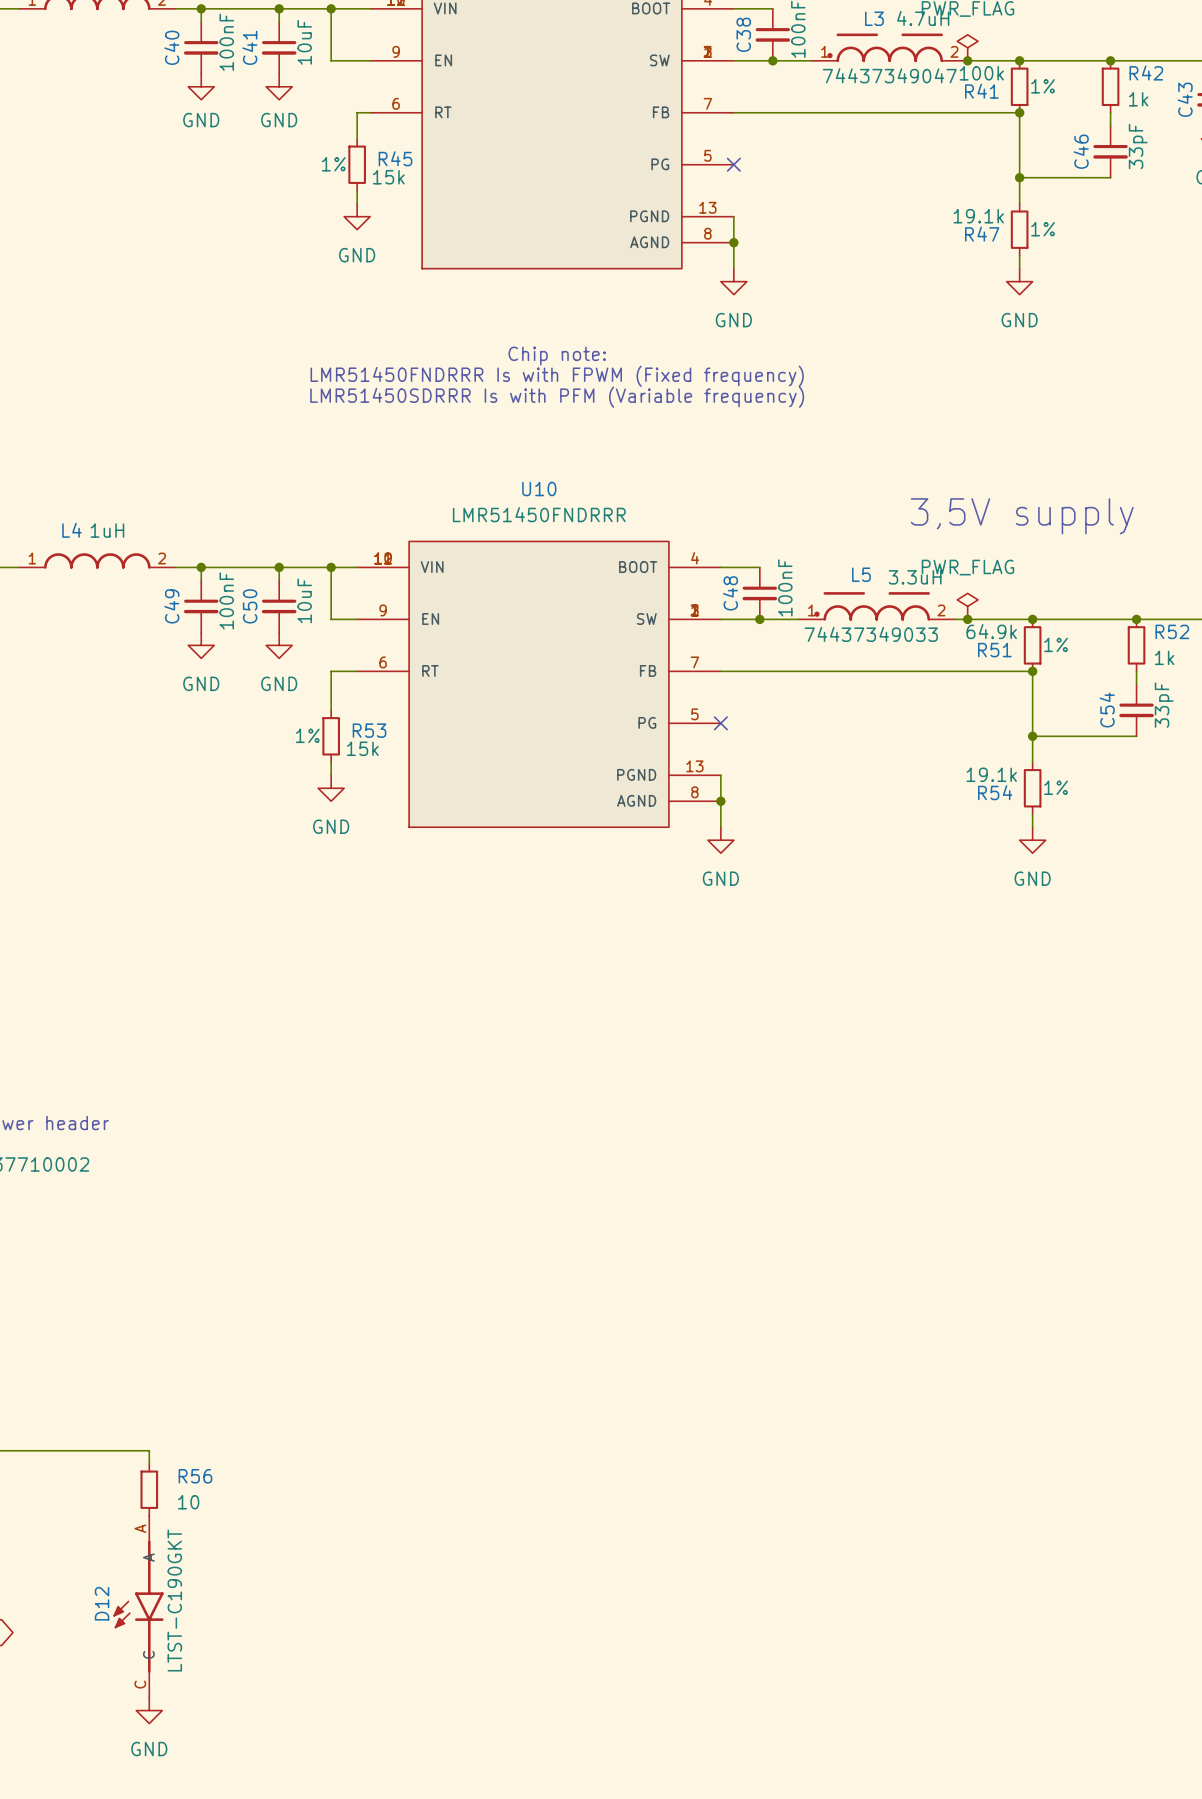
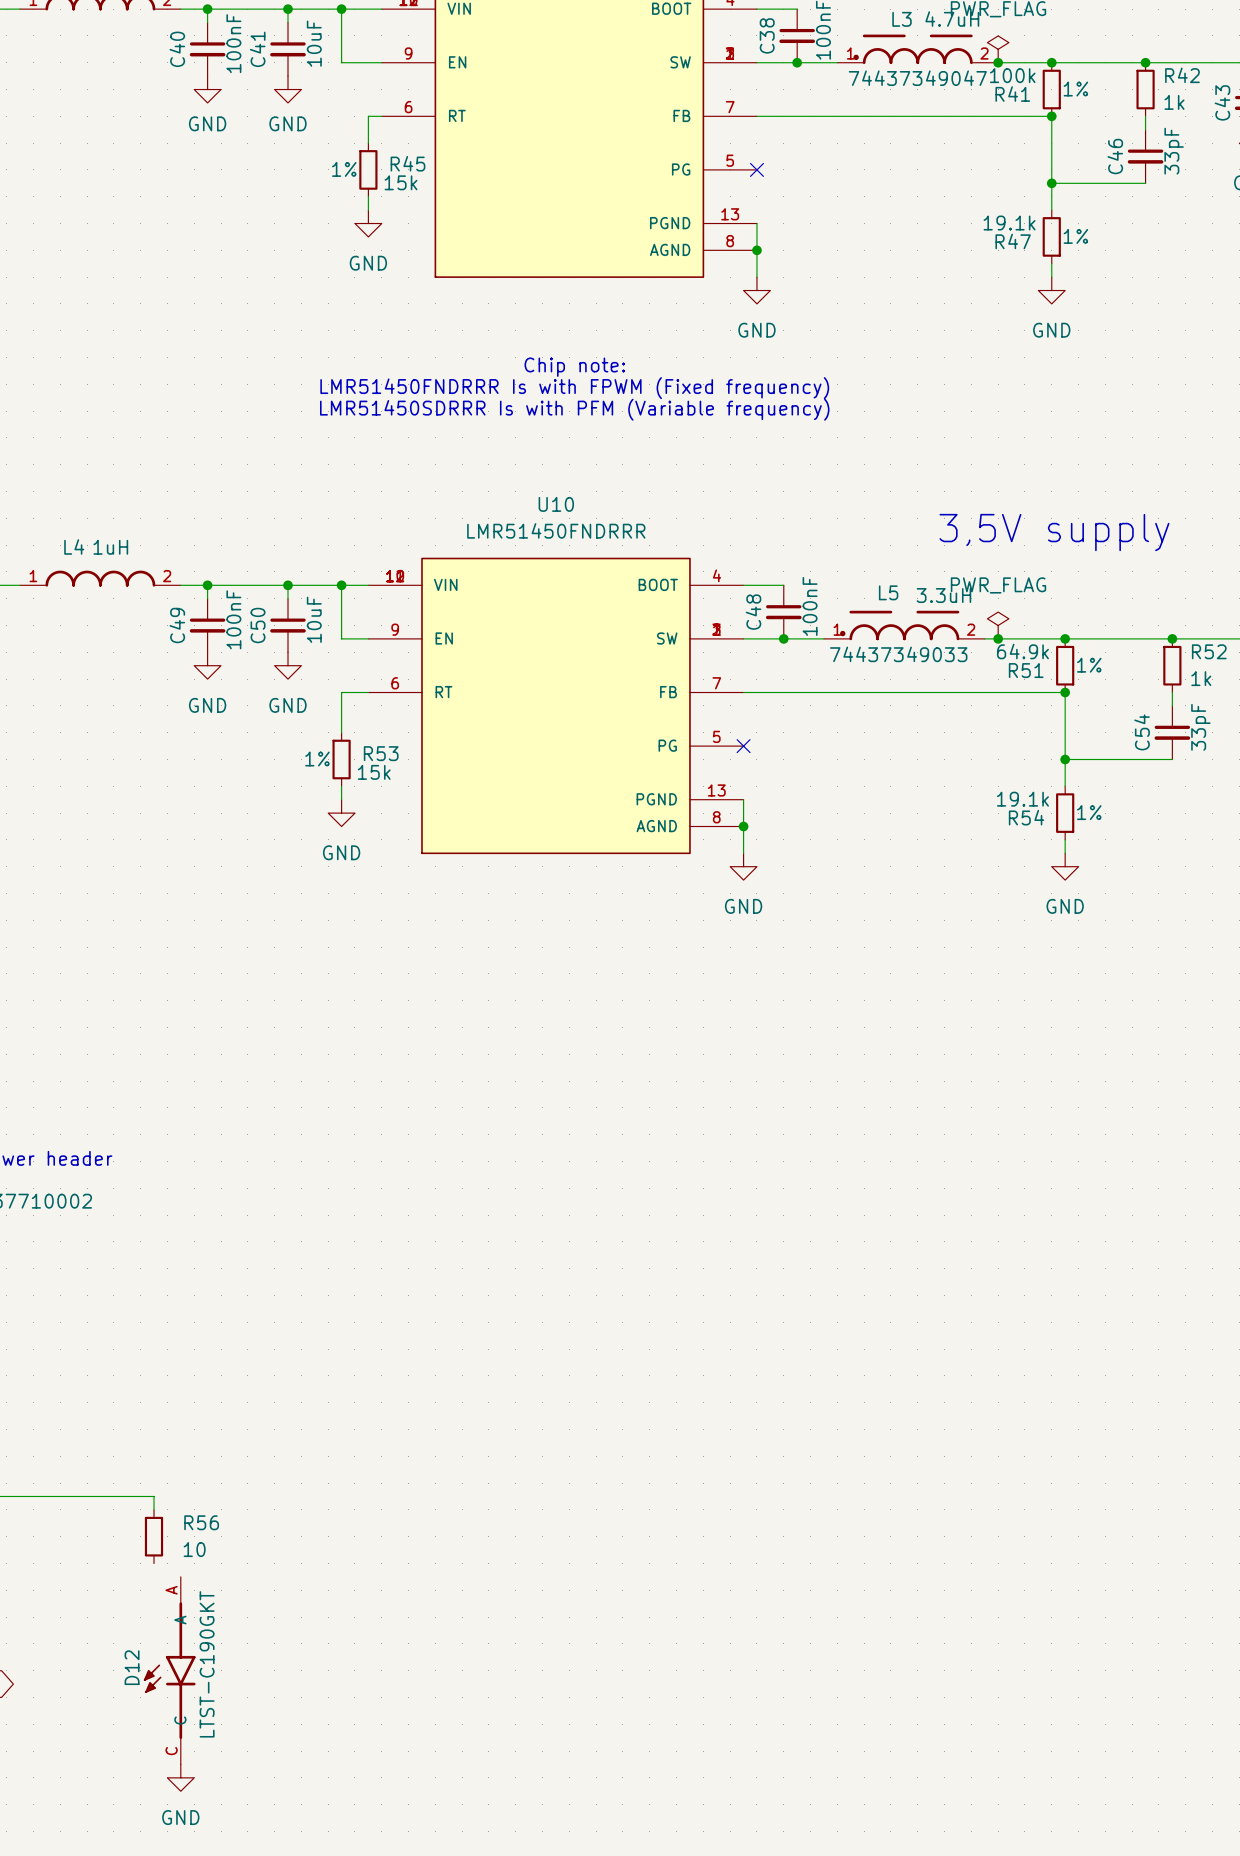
D12 position: (138, 1606) -> (169, 1670)
power symbol position: GND (149, 1710) -> GND (180, 1777)

